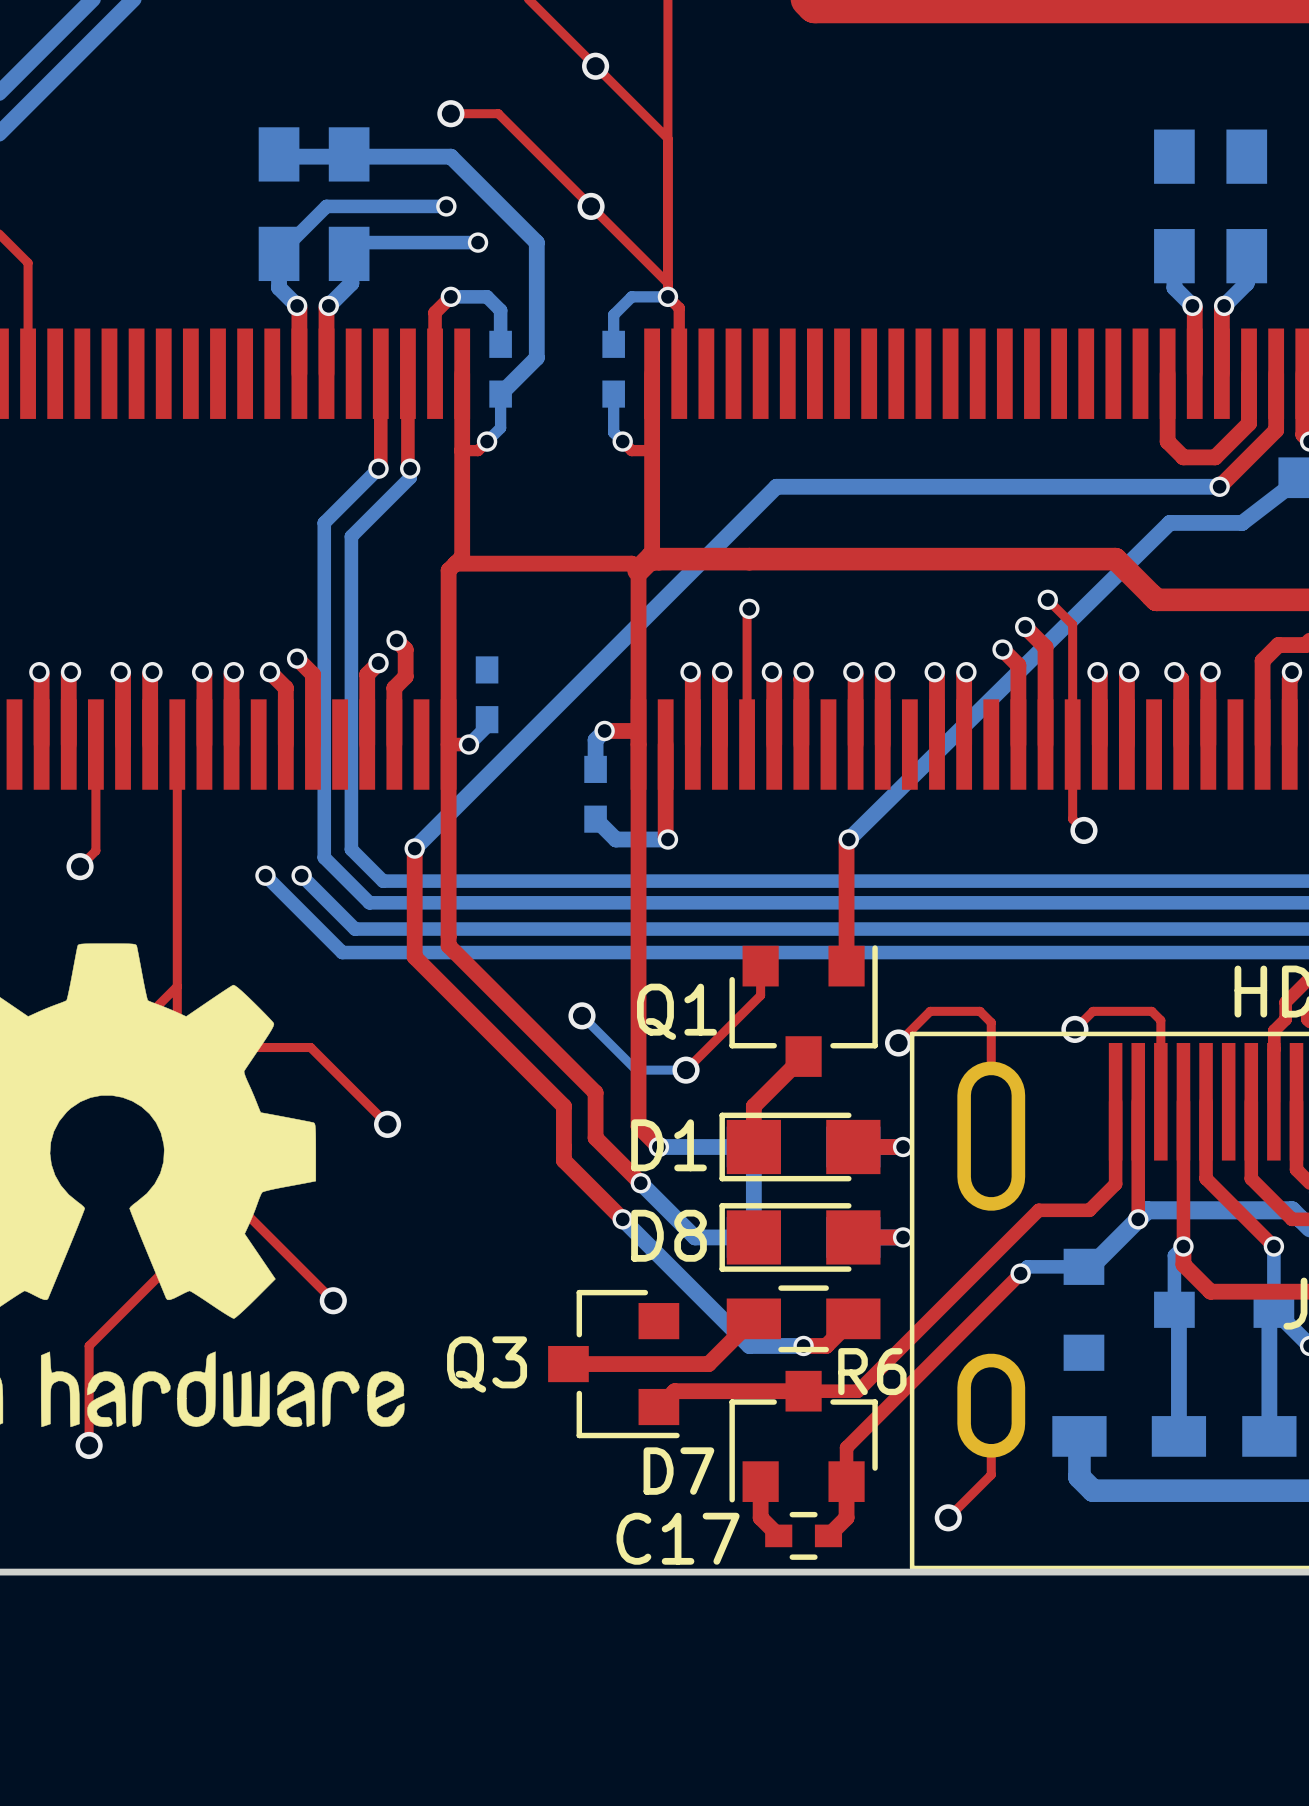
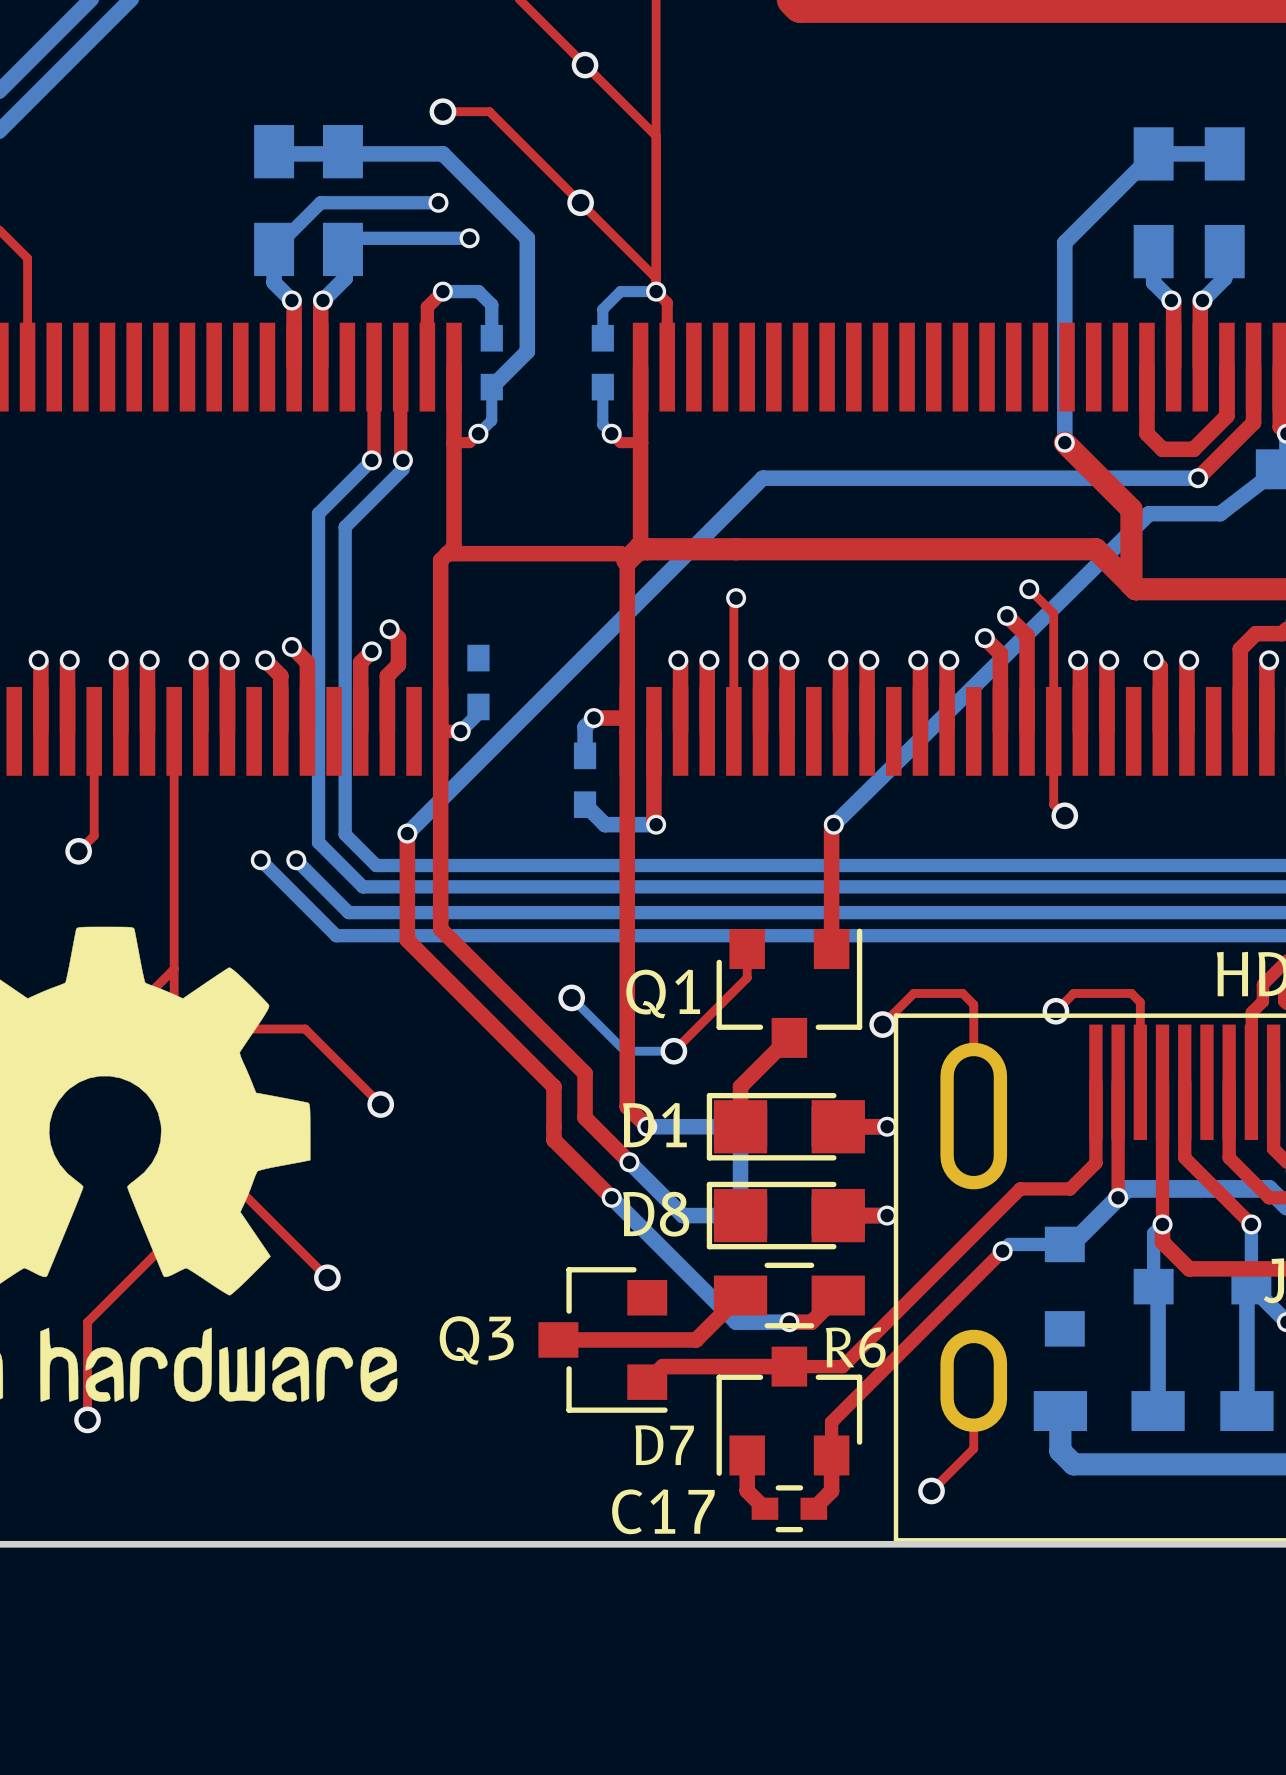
bottom track: none -> (1224, 153) (1153, 153) (1064, 242) (1064, 442)
top track: none -> (1064, 442) (1131, 509) (1131, 584)
via: none -> (1064, 442)

